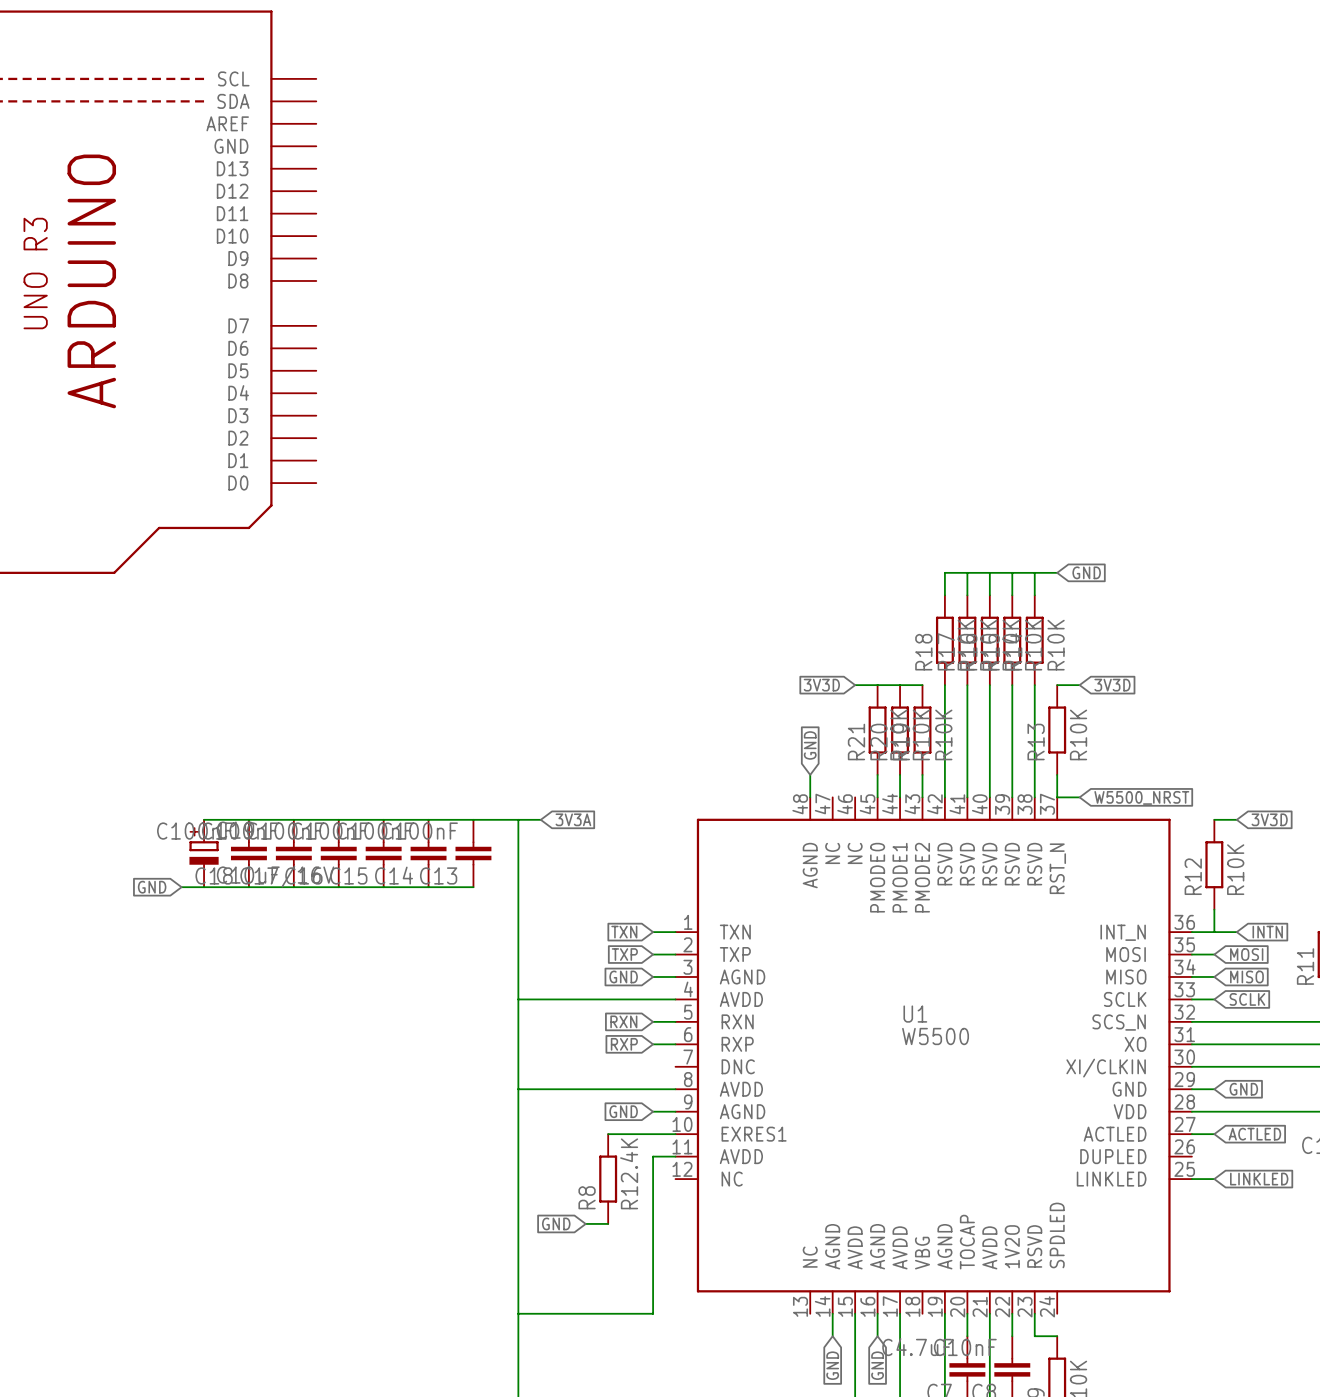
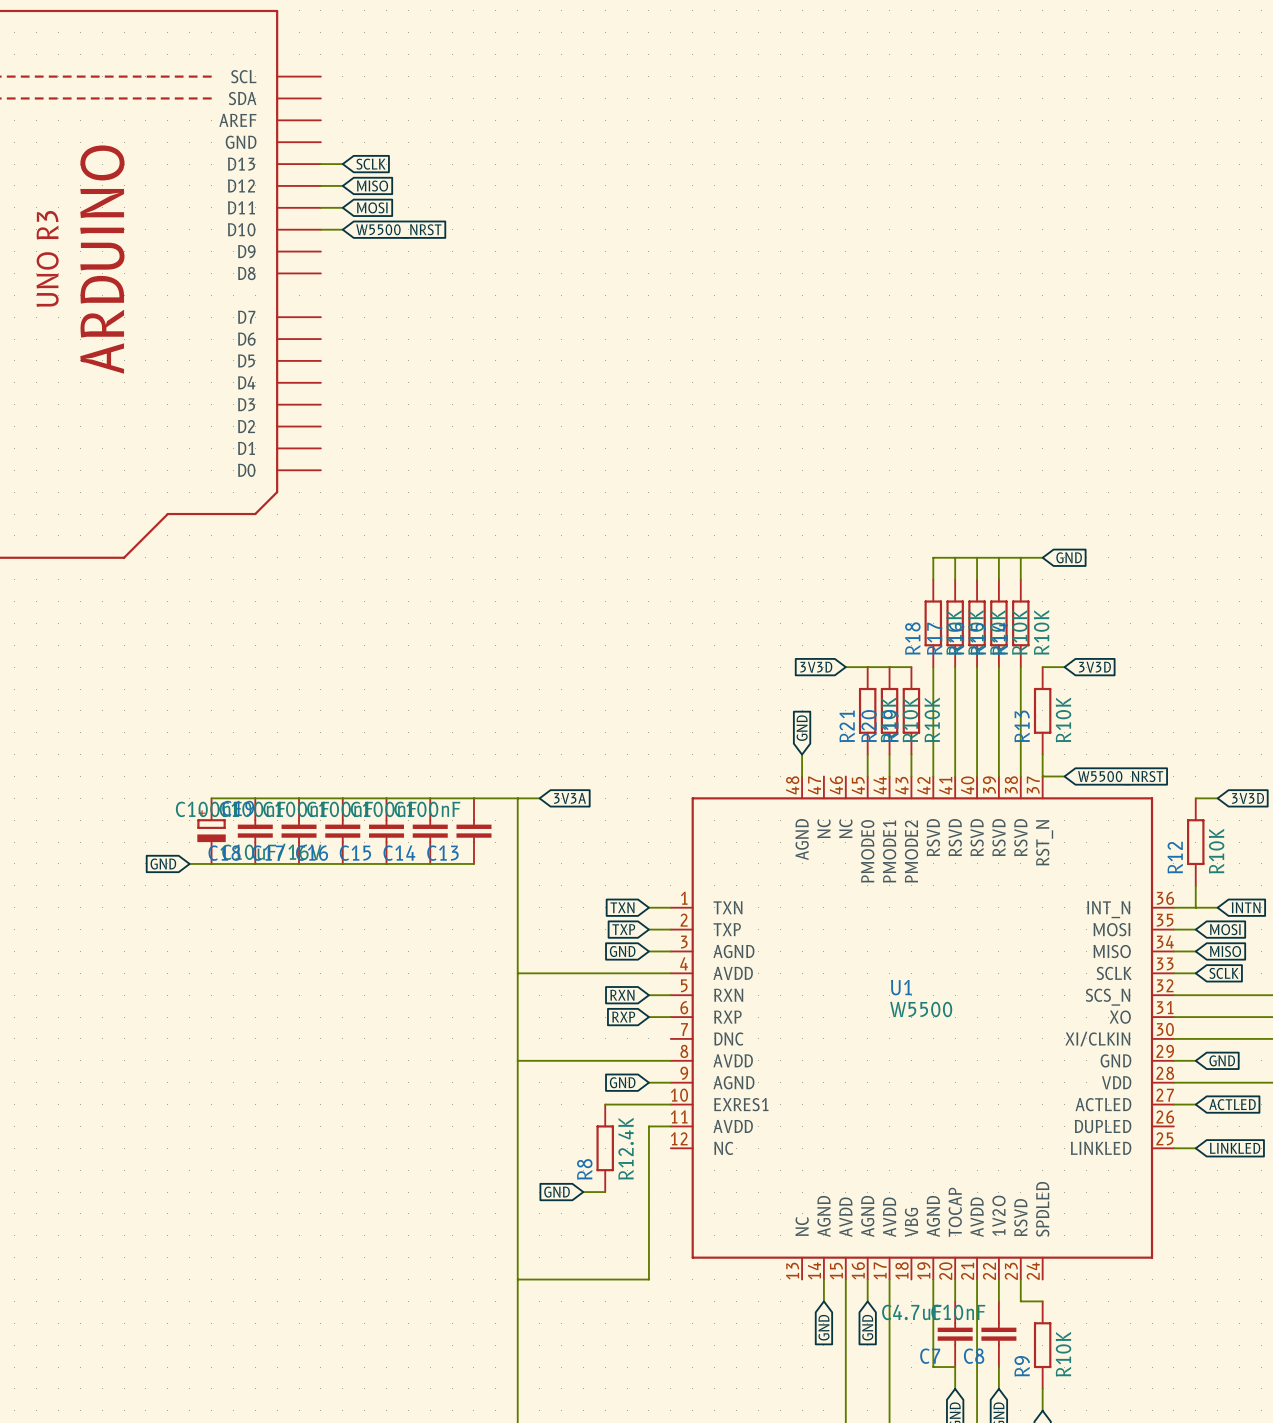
wire: none -> (320, 164) (342, 164)
global label: none -> SCLK (371, 164)
wire: none -> (320, 185) (342, 185)
global label: none -> MISO (372, 186)
wire: none -> (320, 207) (342, 207)
global label: none -> MOSI (372, 207)
wire: none -> (320, 229) (342, 229)
global label: none -> W5500_NRST (398, 231)

